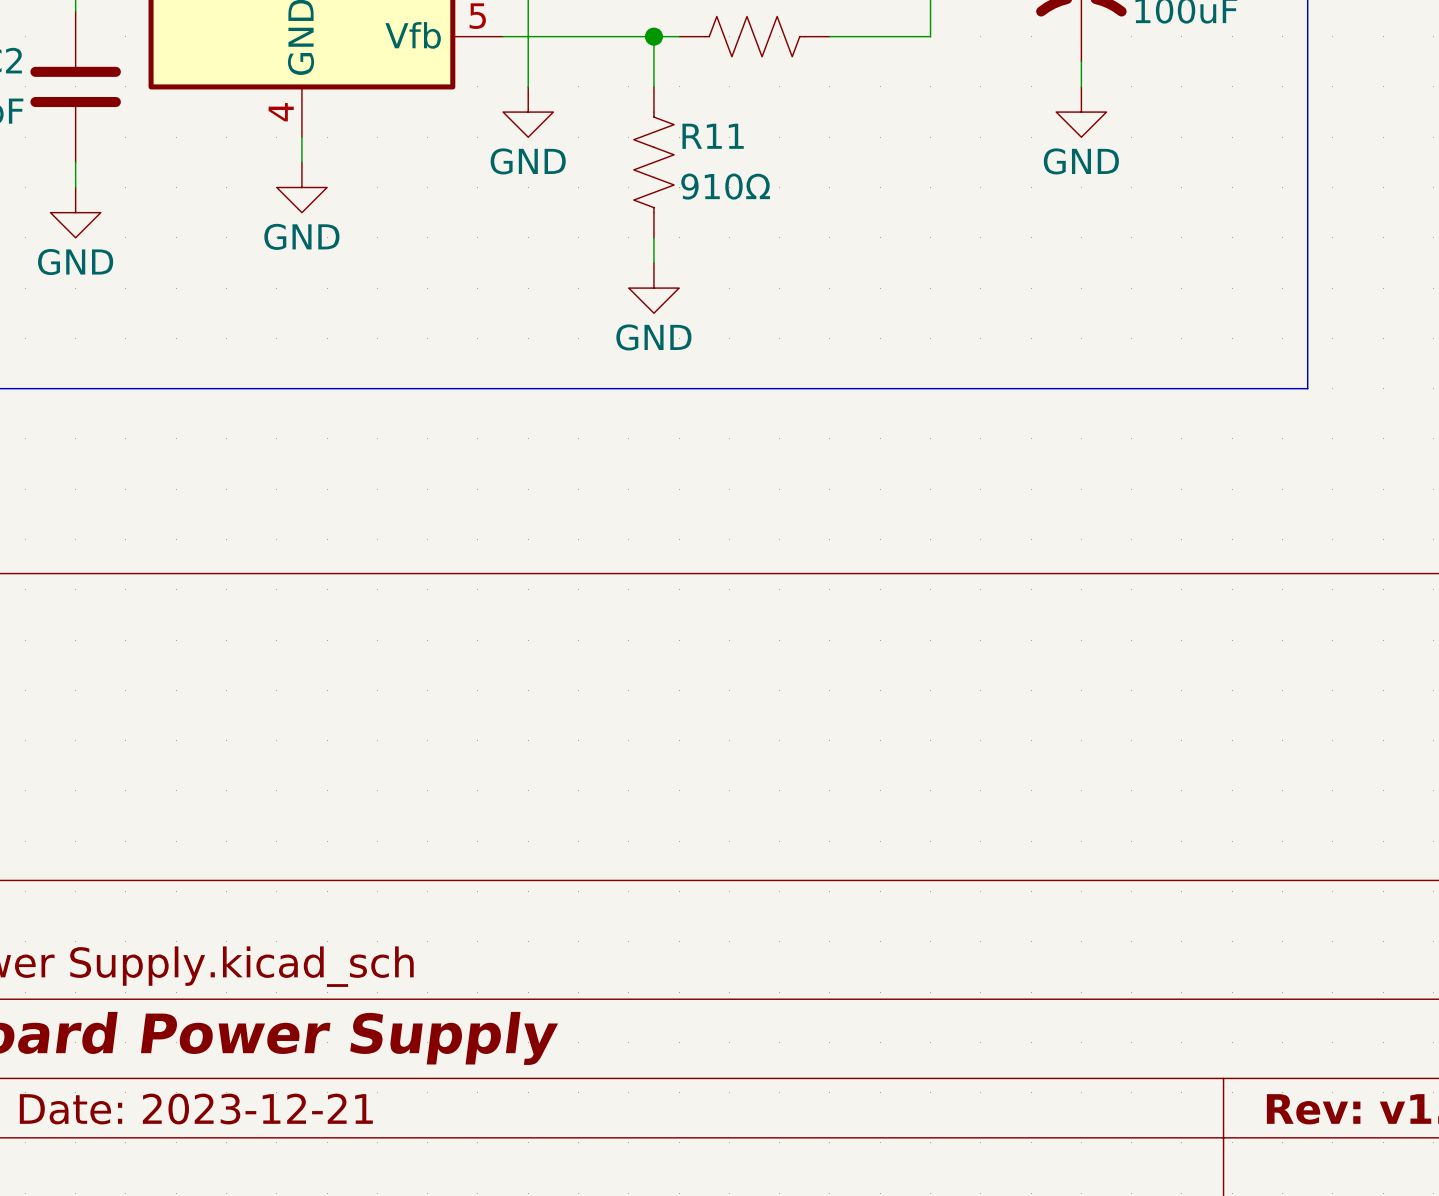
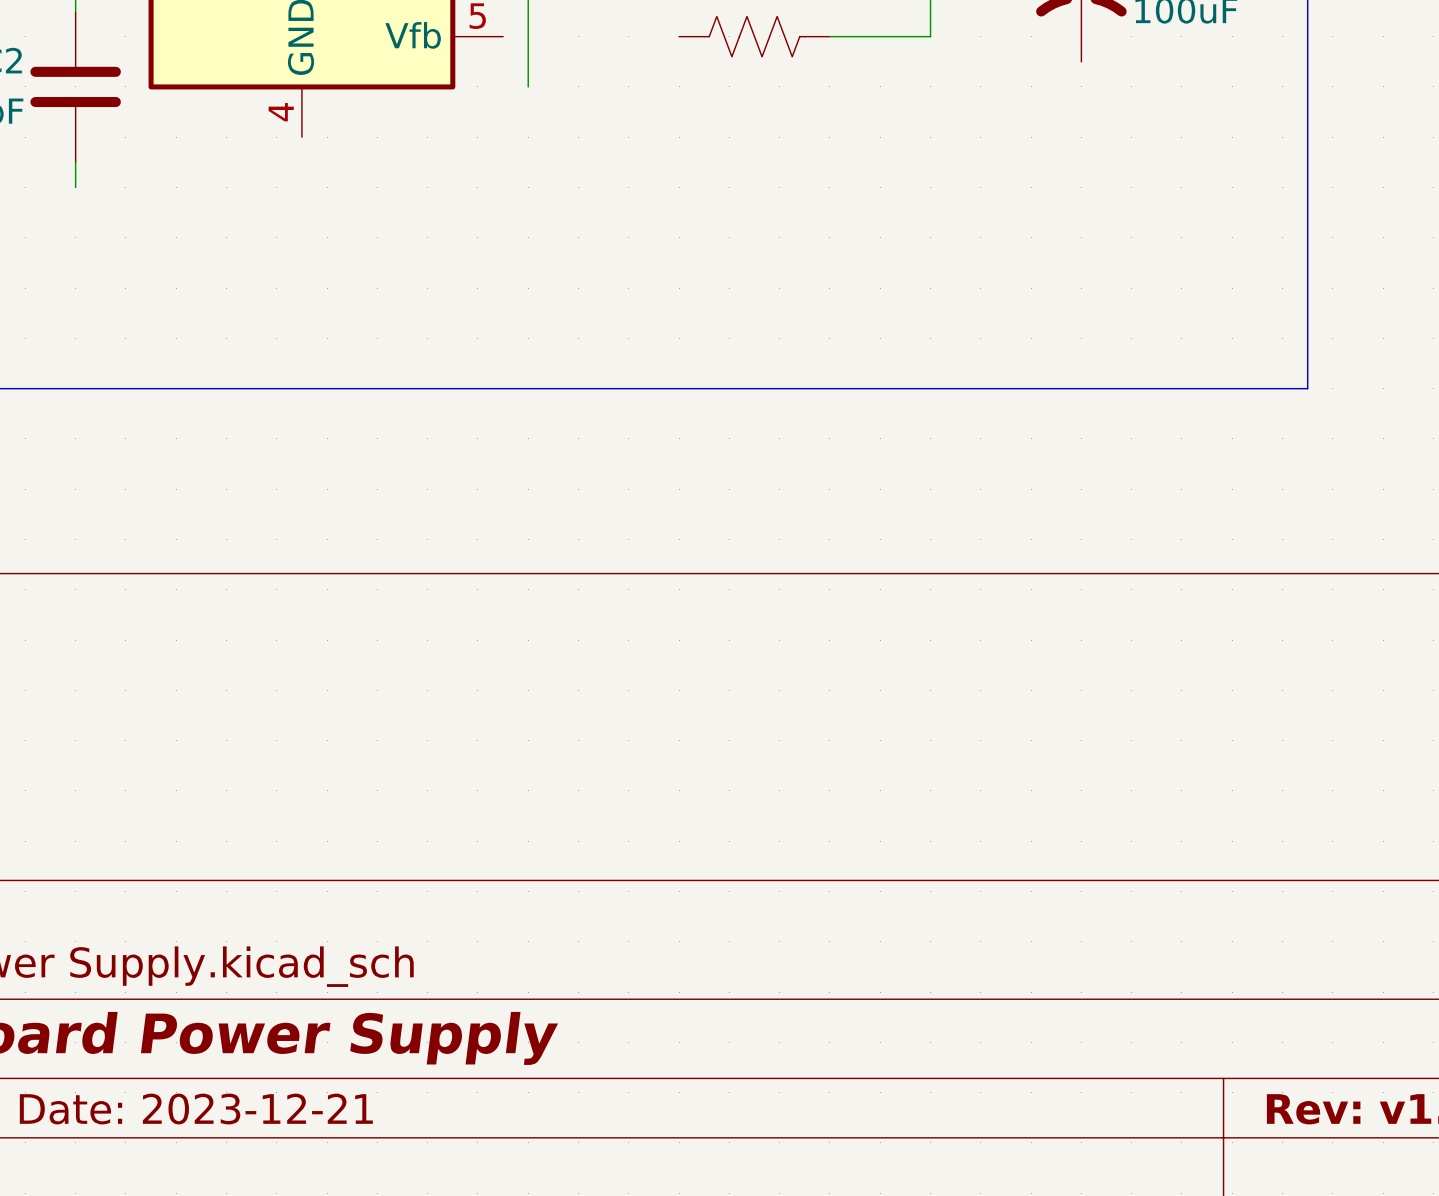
wire: (503, 36) (679, 36) -> none
wire: (653, 36) (653, 86) -> none
junction: (653, 36) -> none
wire: (1081, 61) (1081, 86) -> none
power symbol: GND (528, 112) -> none
power symbol: GND (1081, 112) -> none
wire: (301, 137) (301, 162) -> none
R11: 910Ω (653, 162) -> none
power symbol: GND (301, 187) -> none
power symbol: GND (75, 212) -> none
wire: (653, 237) (653, 262) -> none
power symbol: GND (653, 288) -> none

